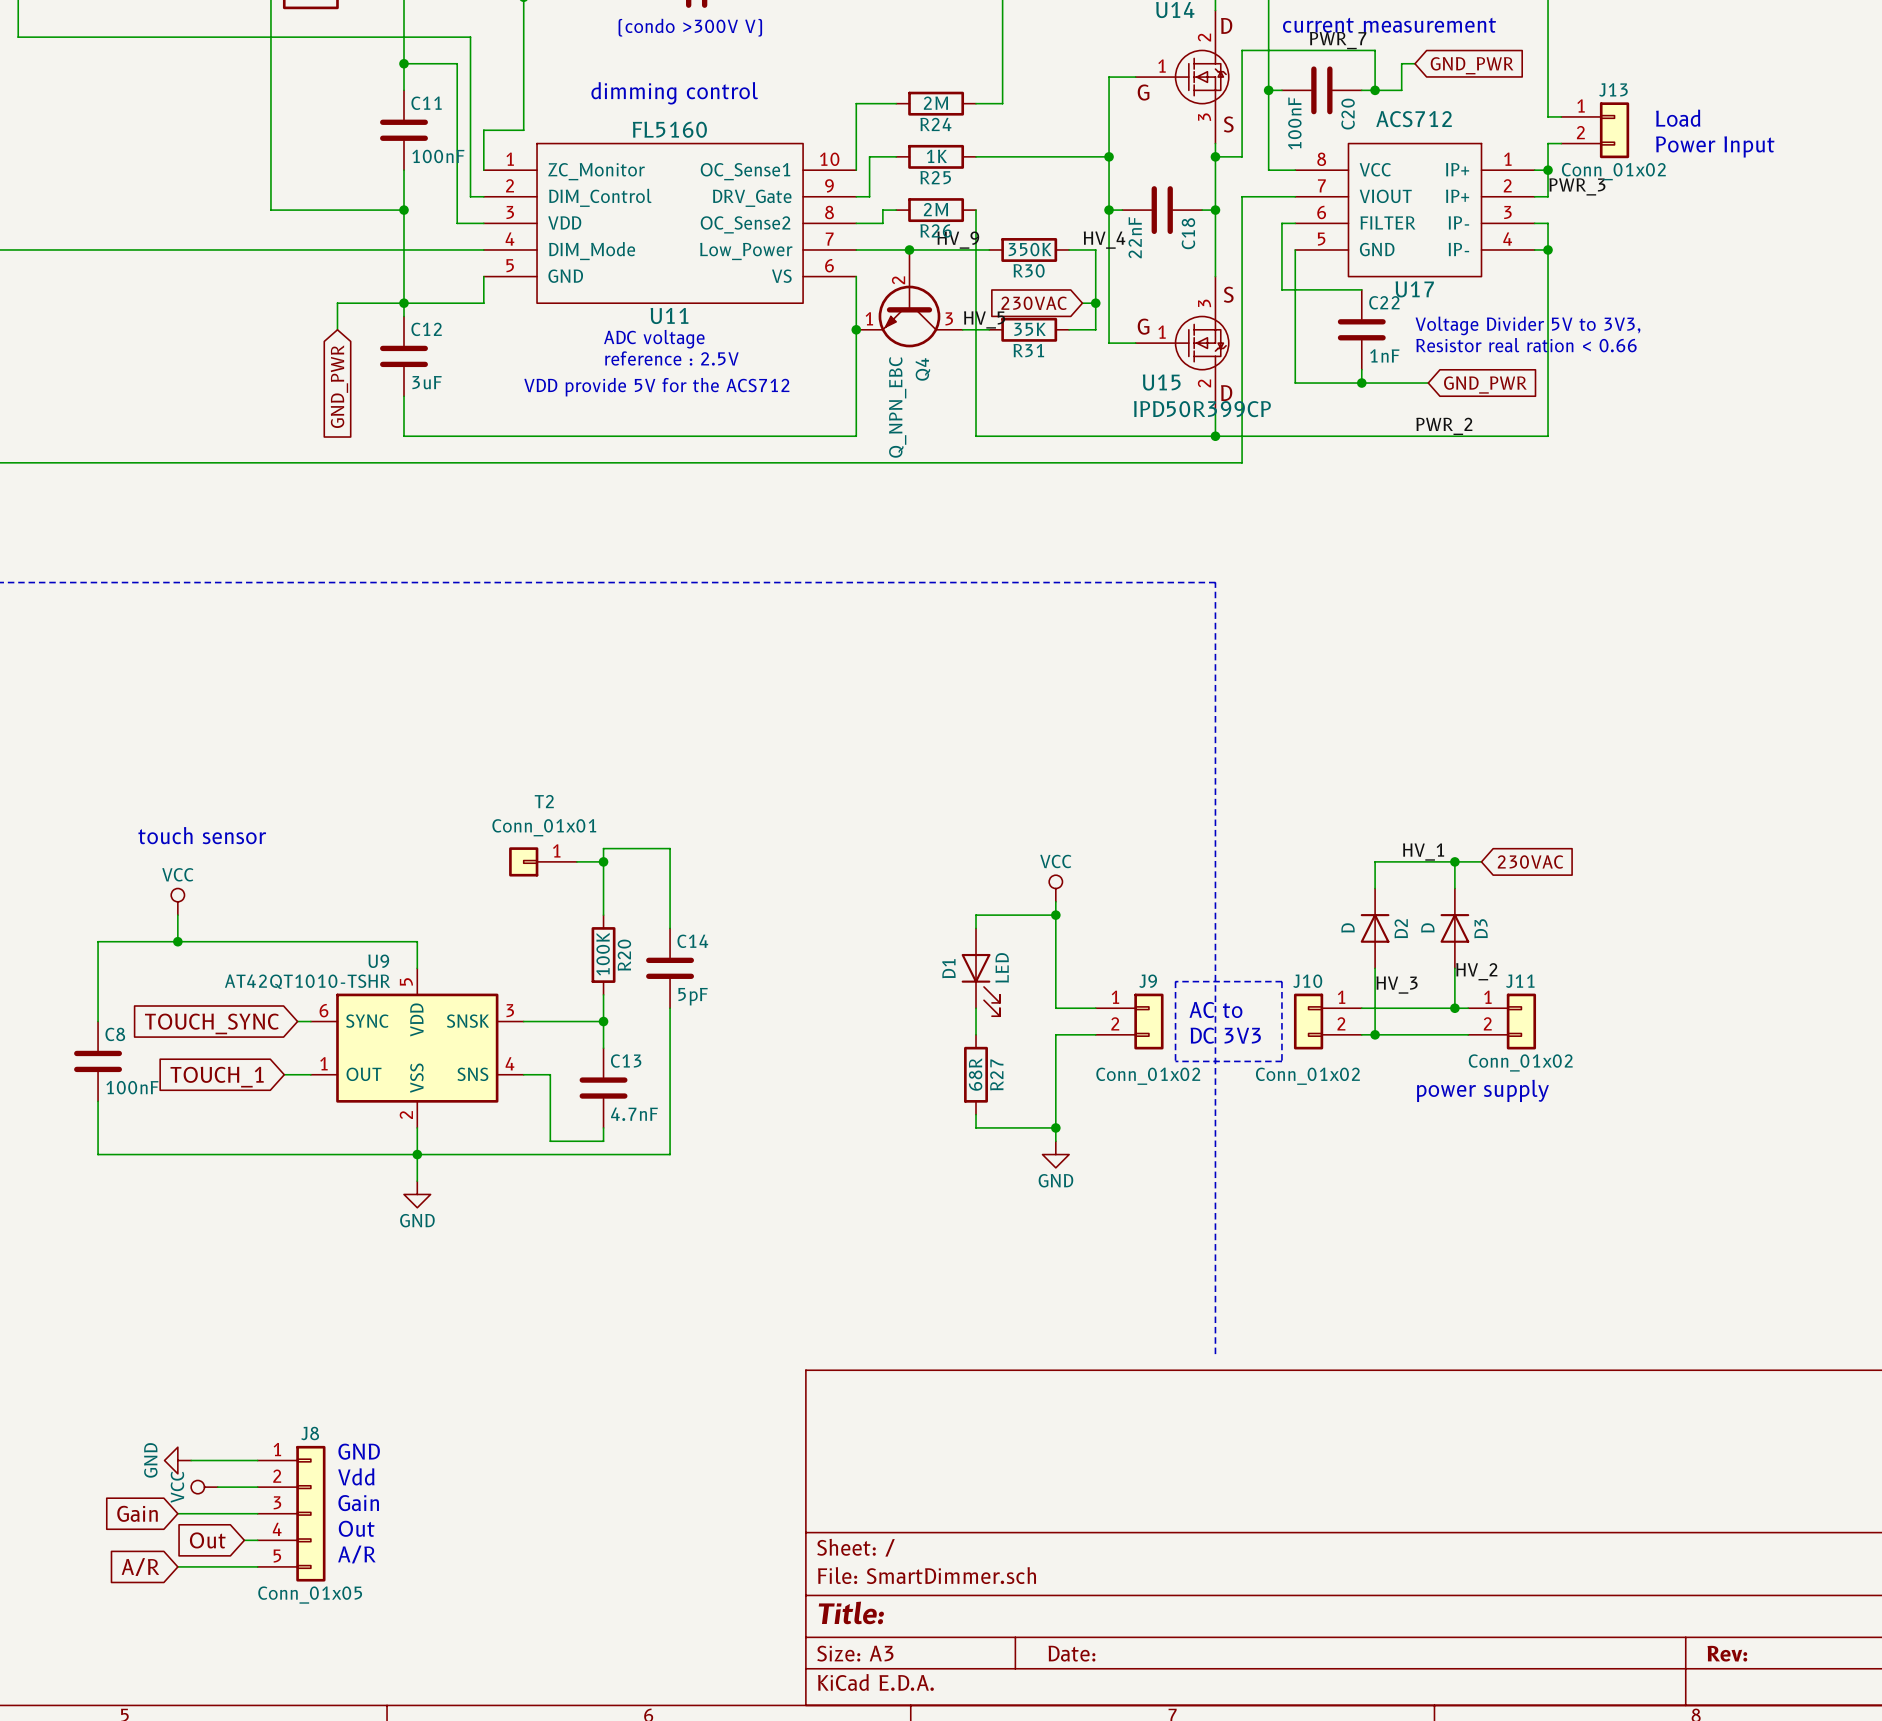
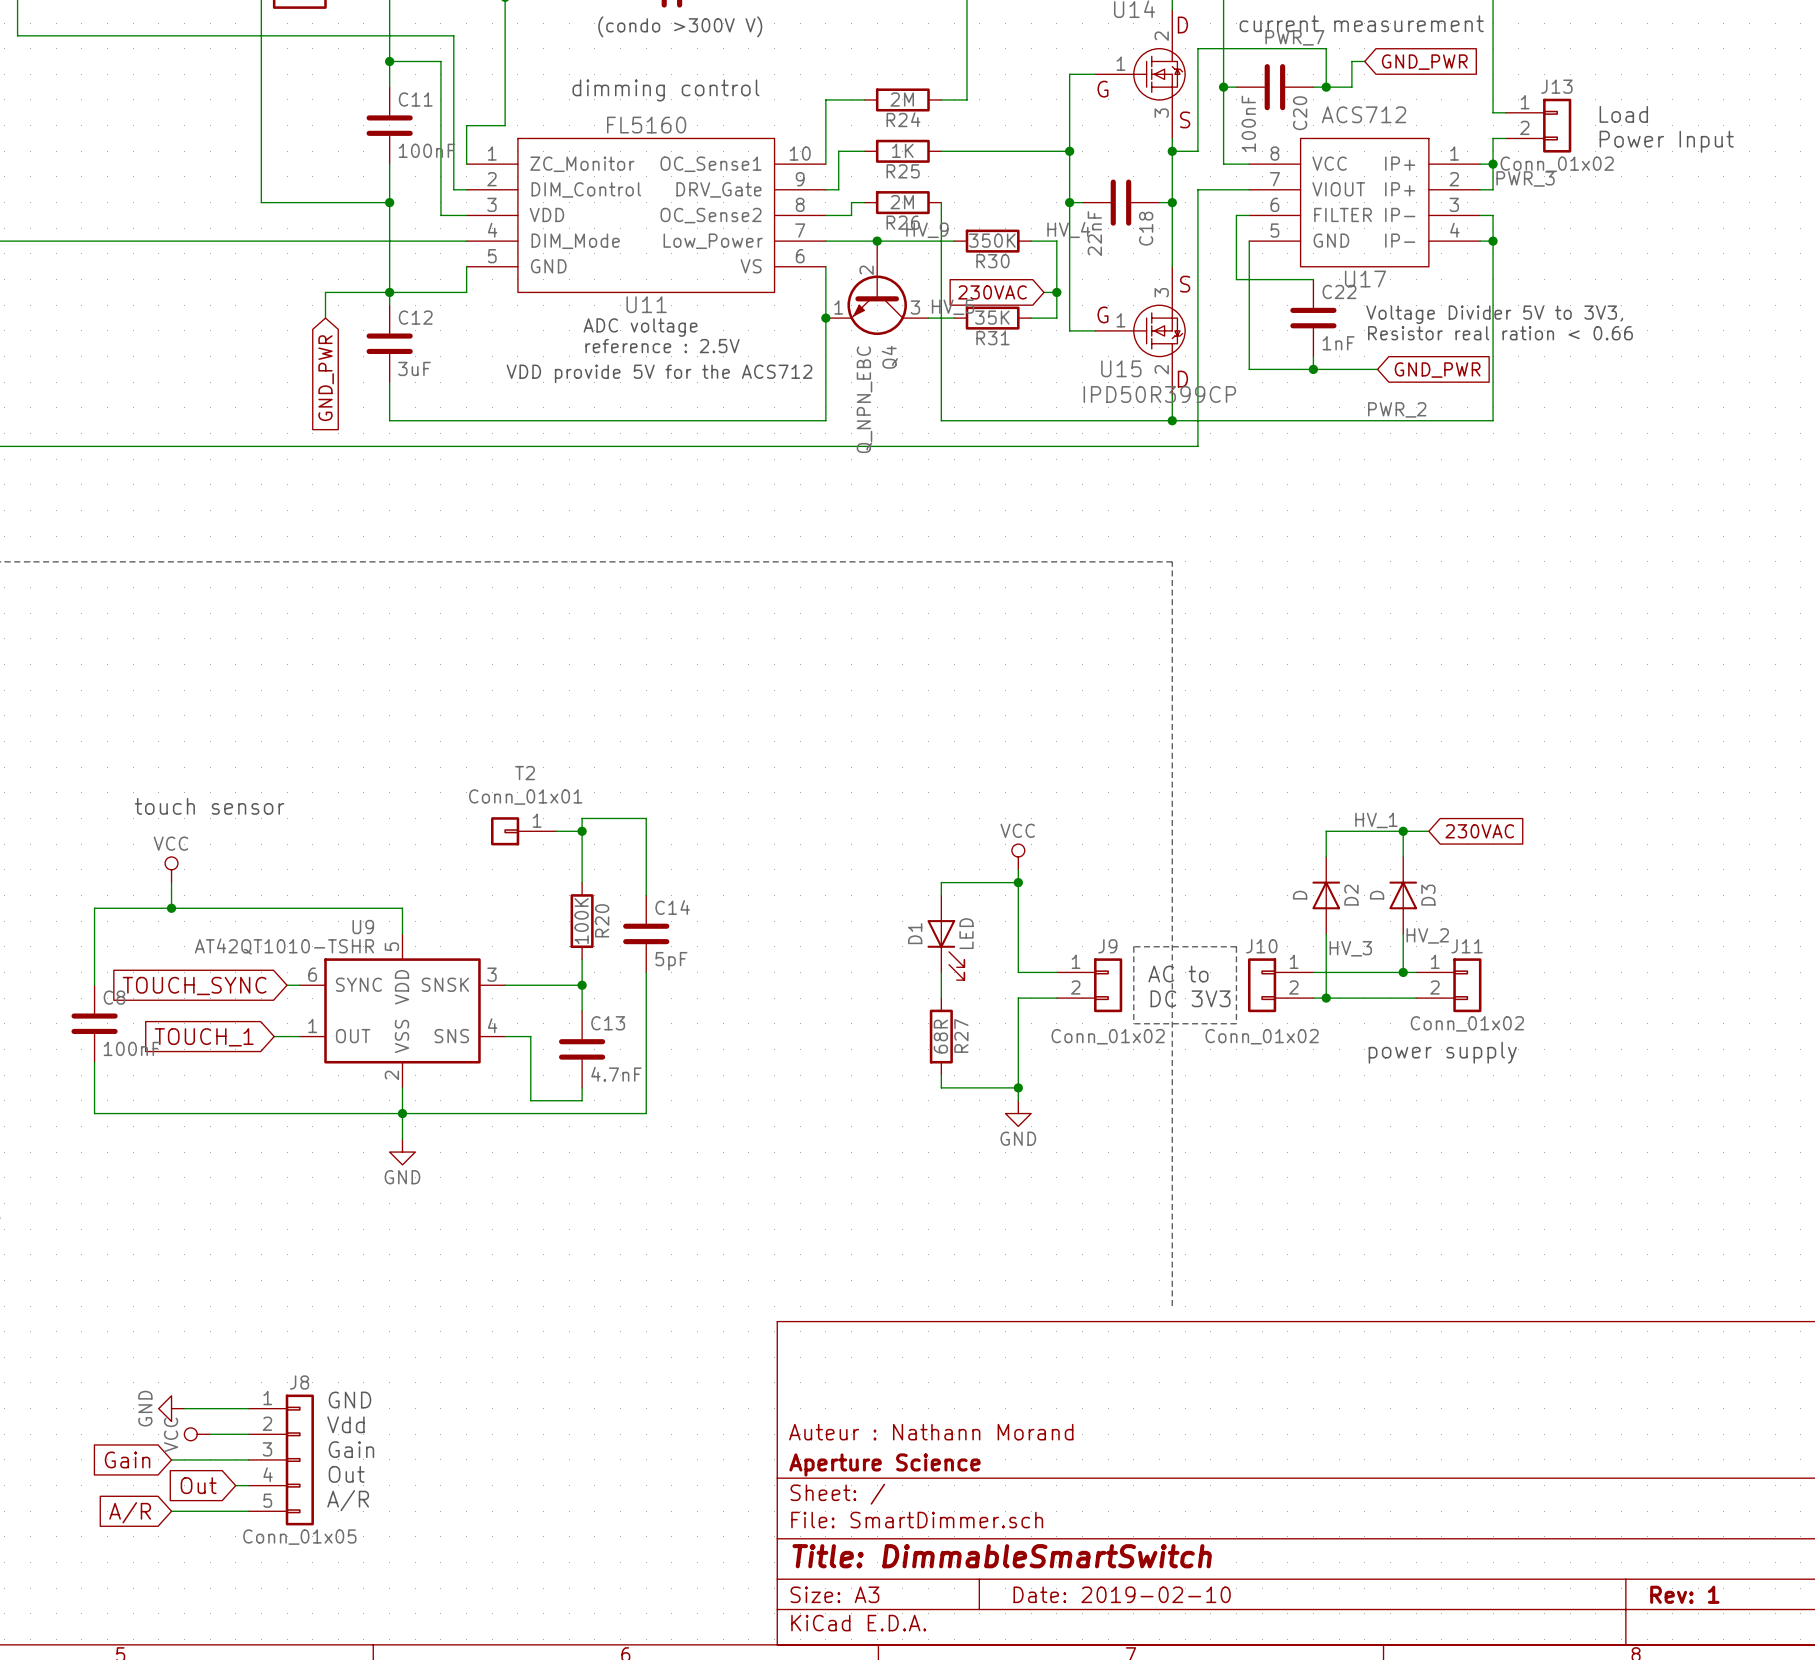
title block: none -> Auteur : Nathann Morand (931, 1432)
title block: none -> Aperture Science (884, 1464)
title block: Title: (851, 1612) -> Title: DimmableSmartSwitch (1002, 1556)
title block: Date: (1071, 1653) -> Date: 2019-02-10 (1122, 1594)
title block: Rev: (1727, 1653) -> Rev: 1 (1684, 1594)

